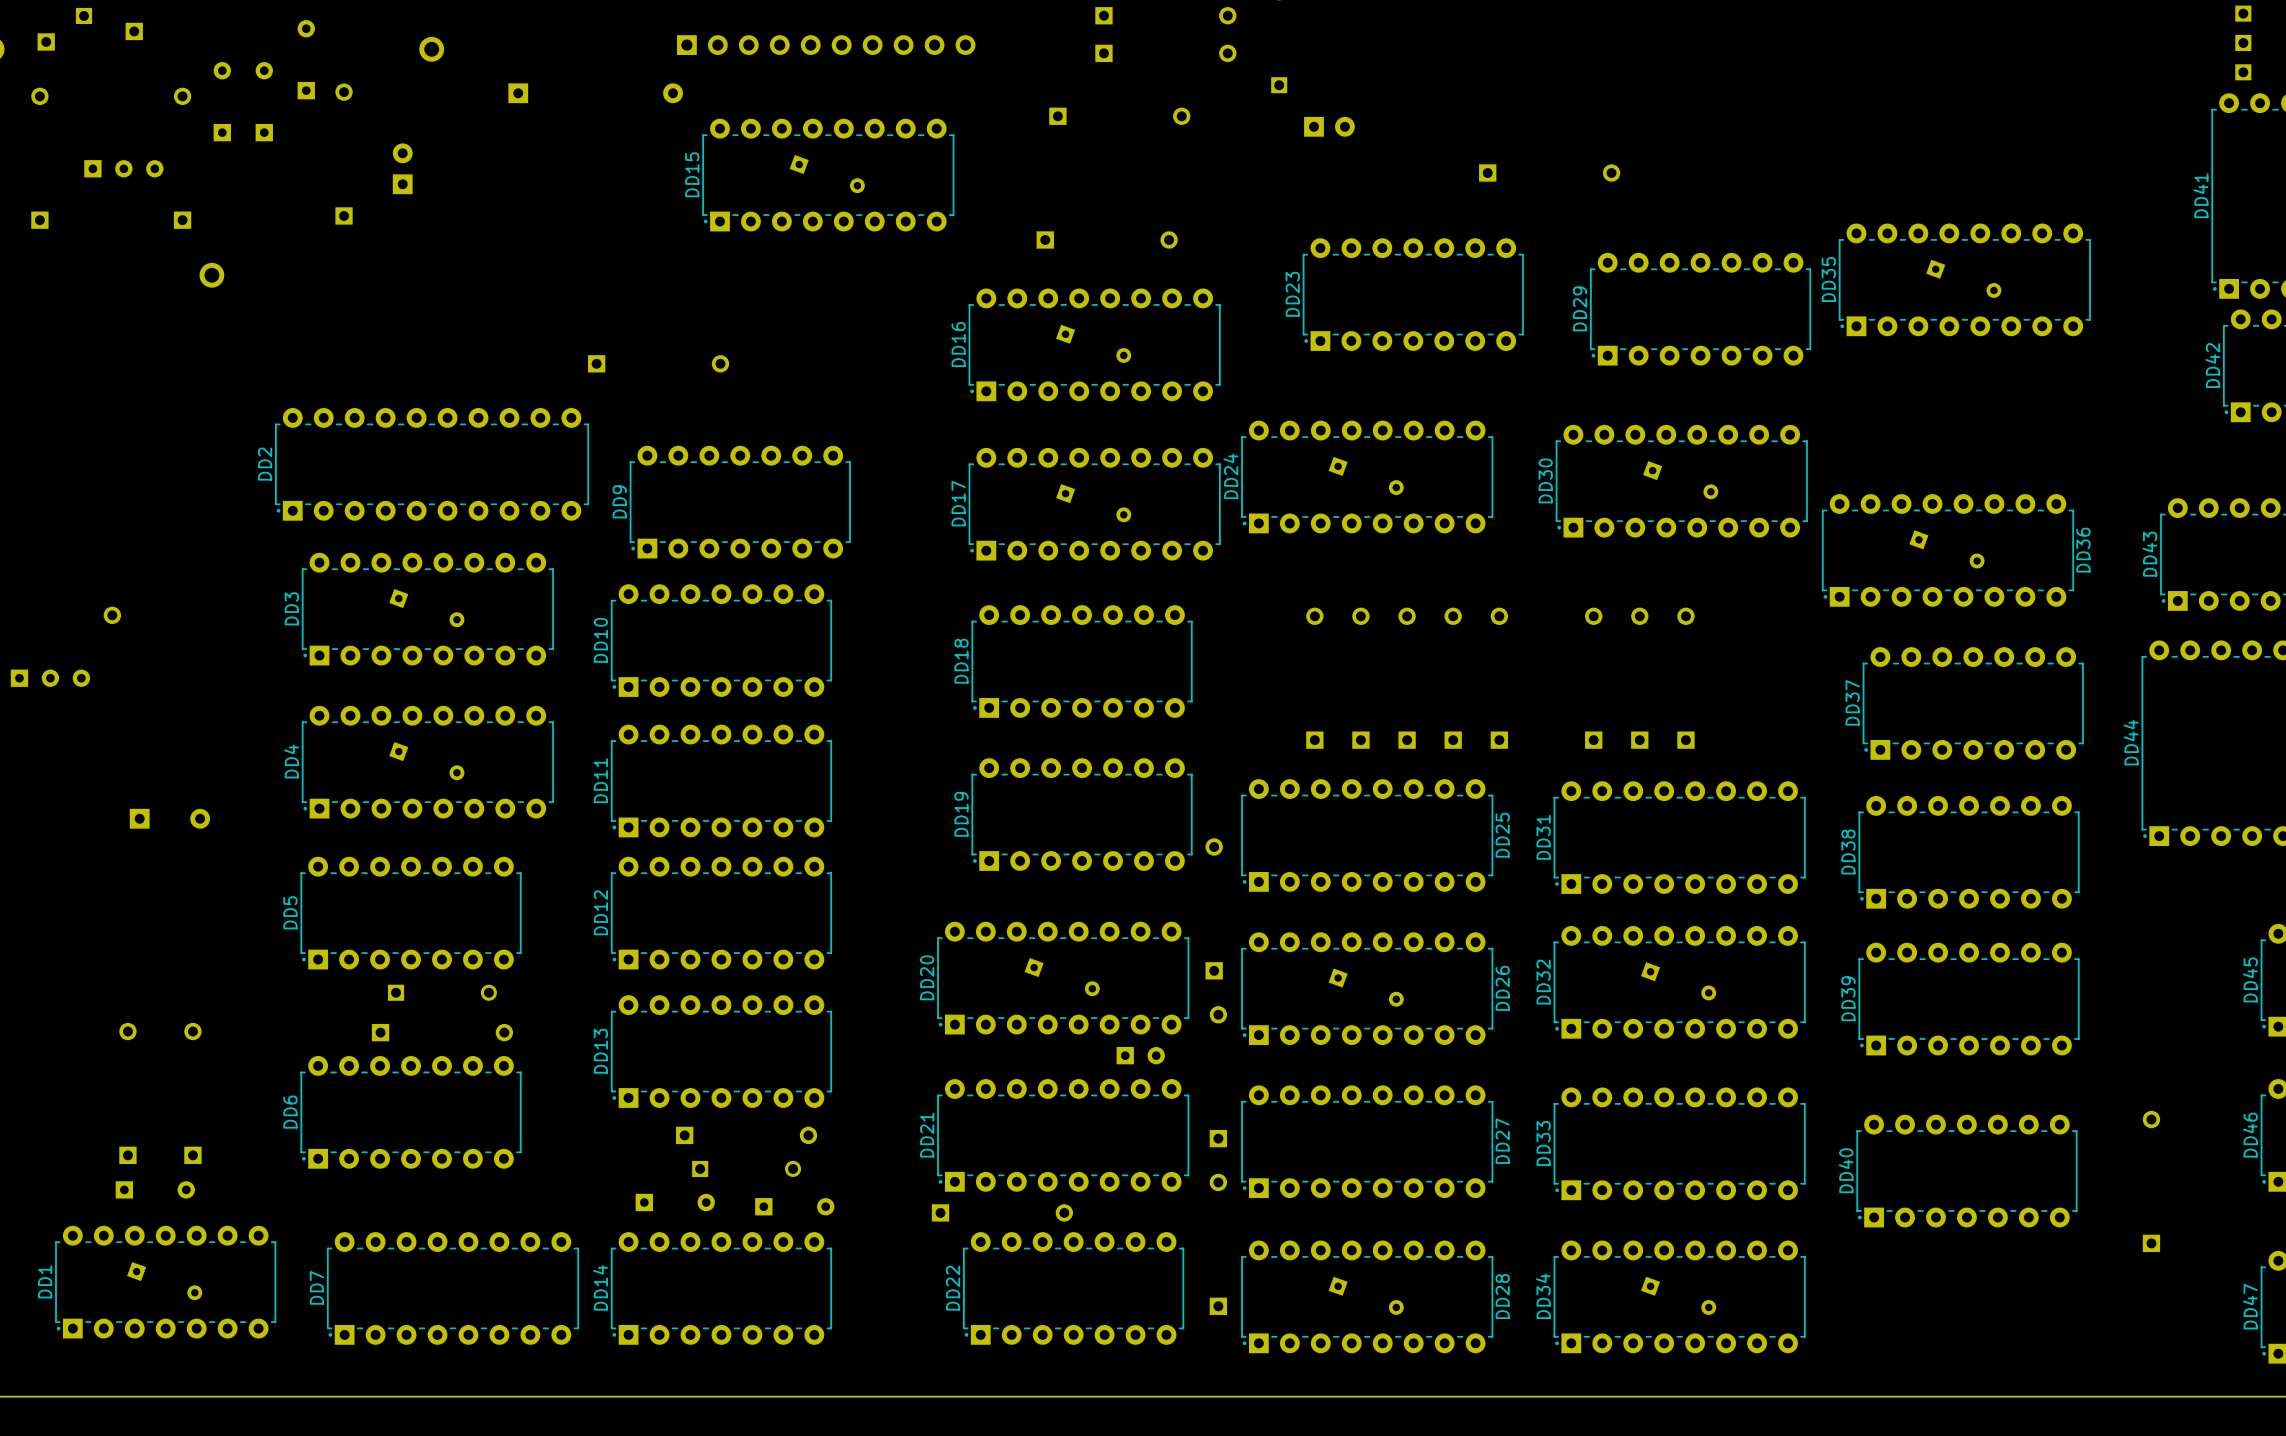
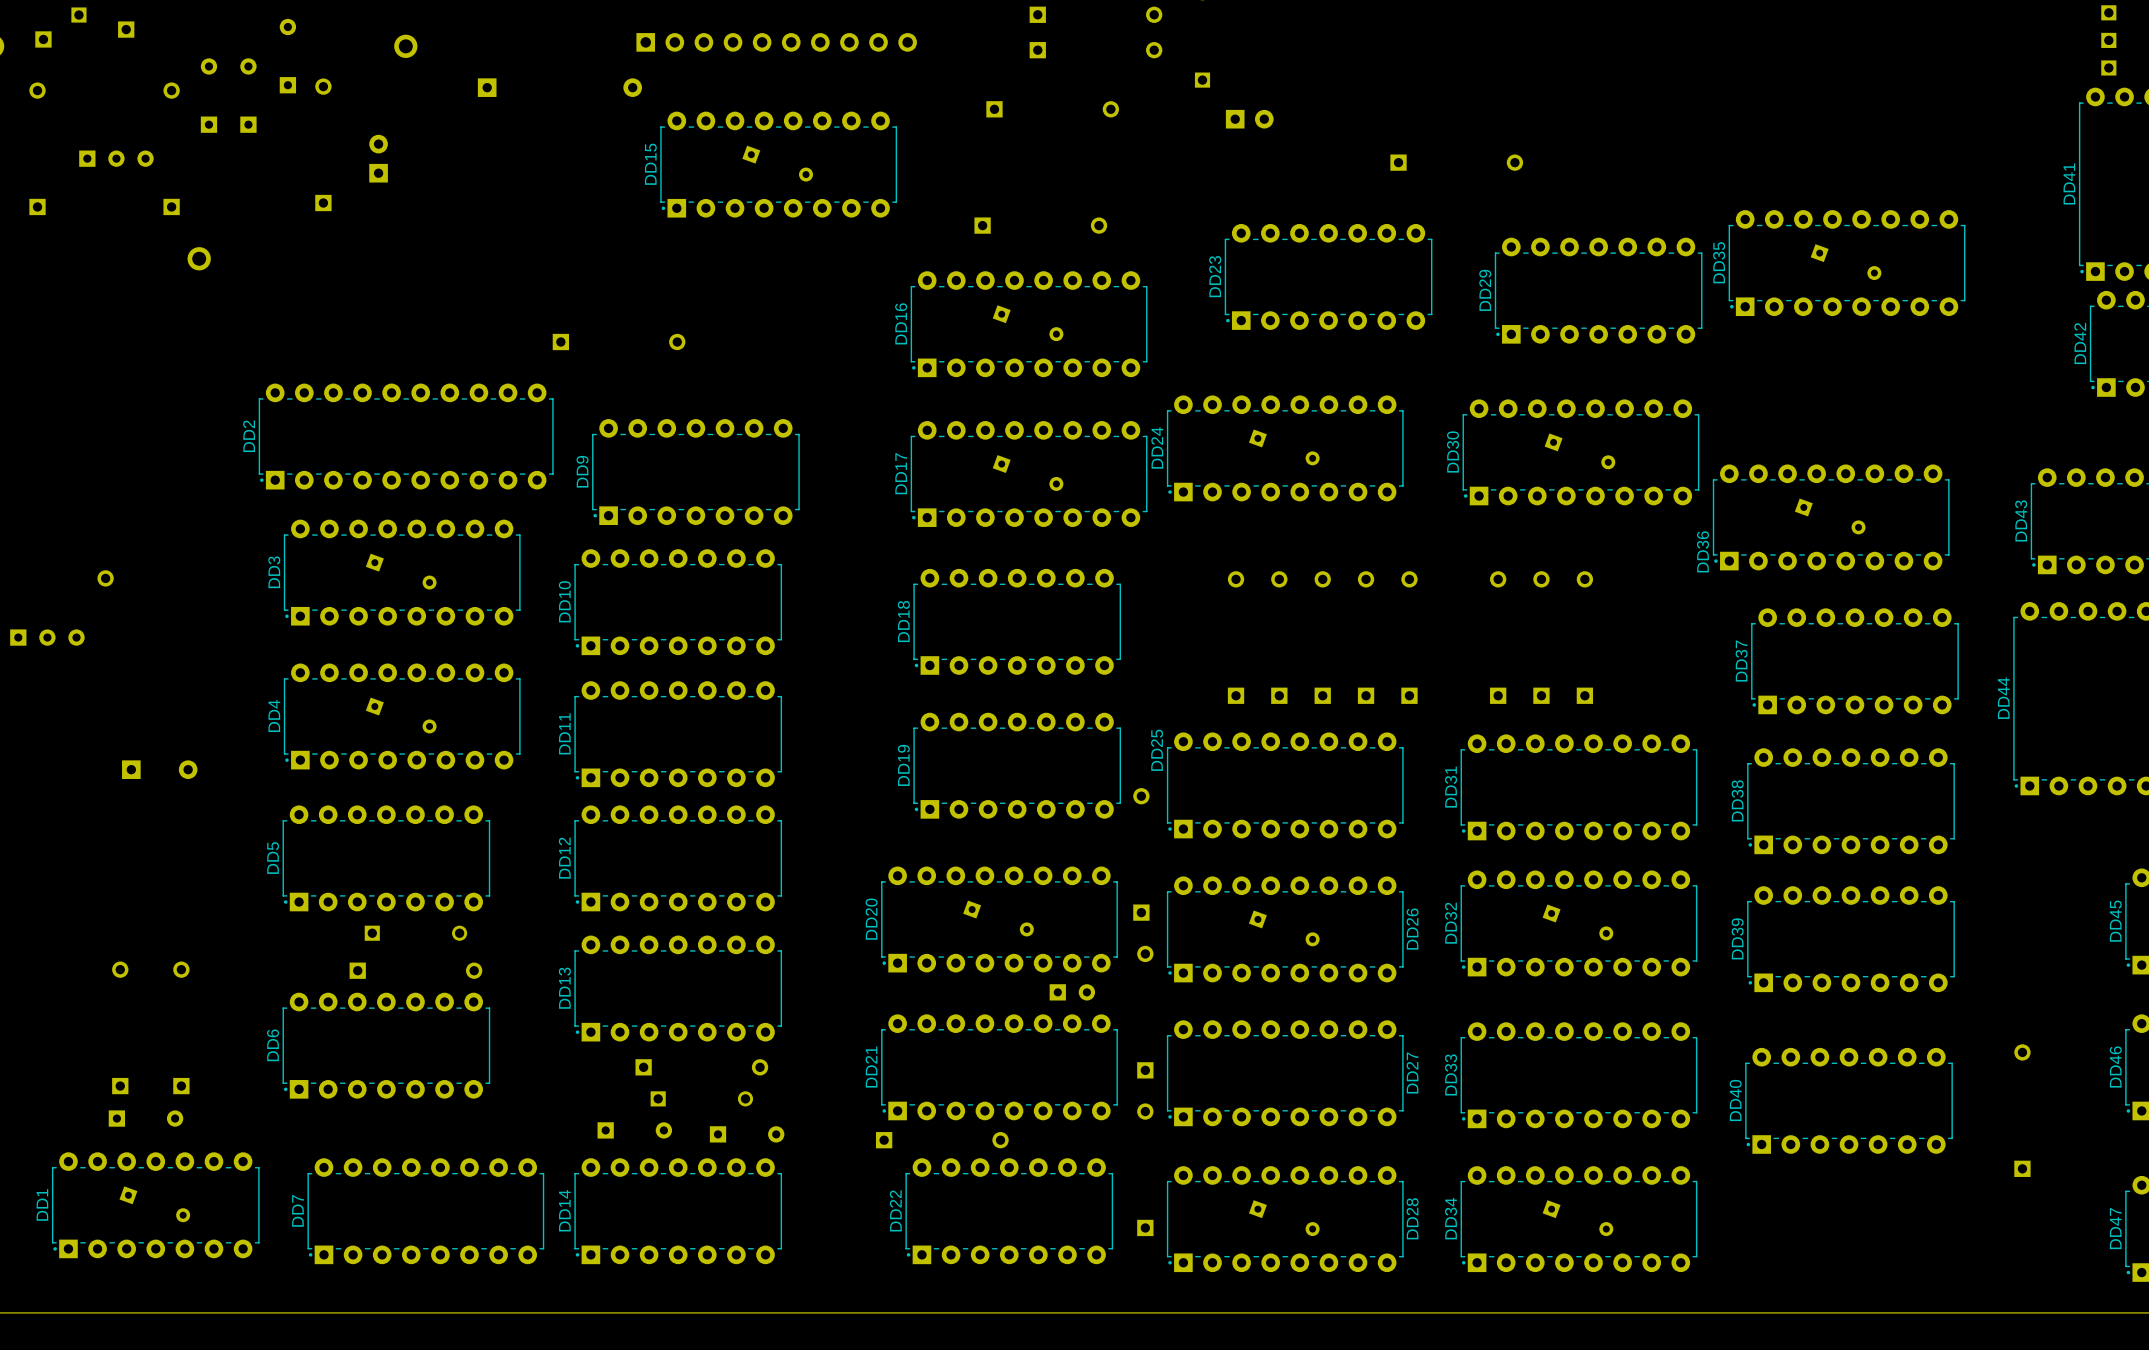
DD36 name position: DD36 (2083, 550) -> DD36 (1703, 551)
DD25 name position: DD25 (1502, 835) -> DD25 (1157, 750)

